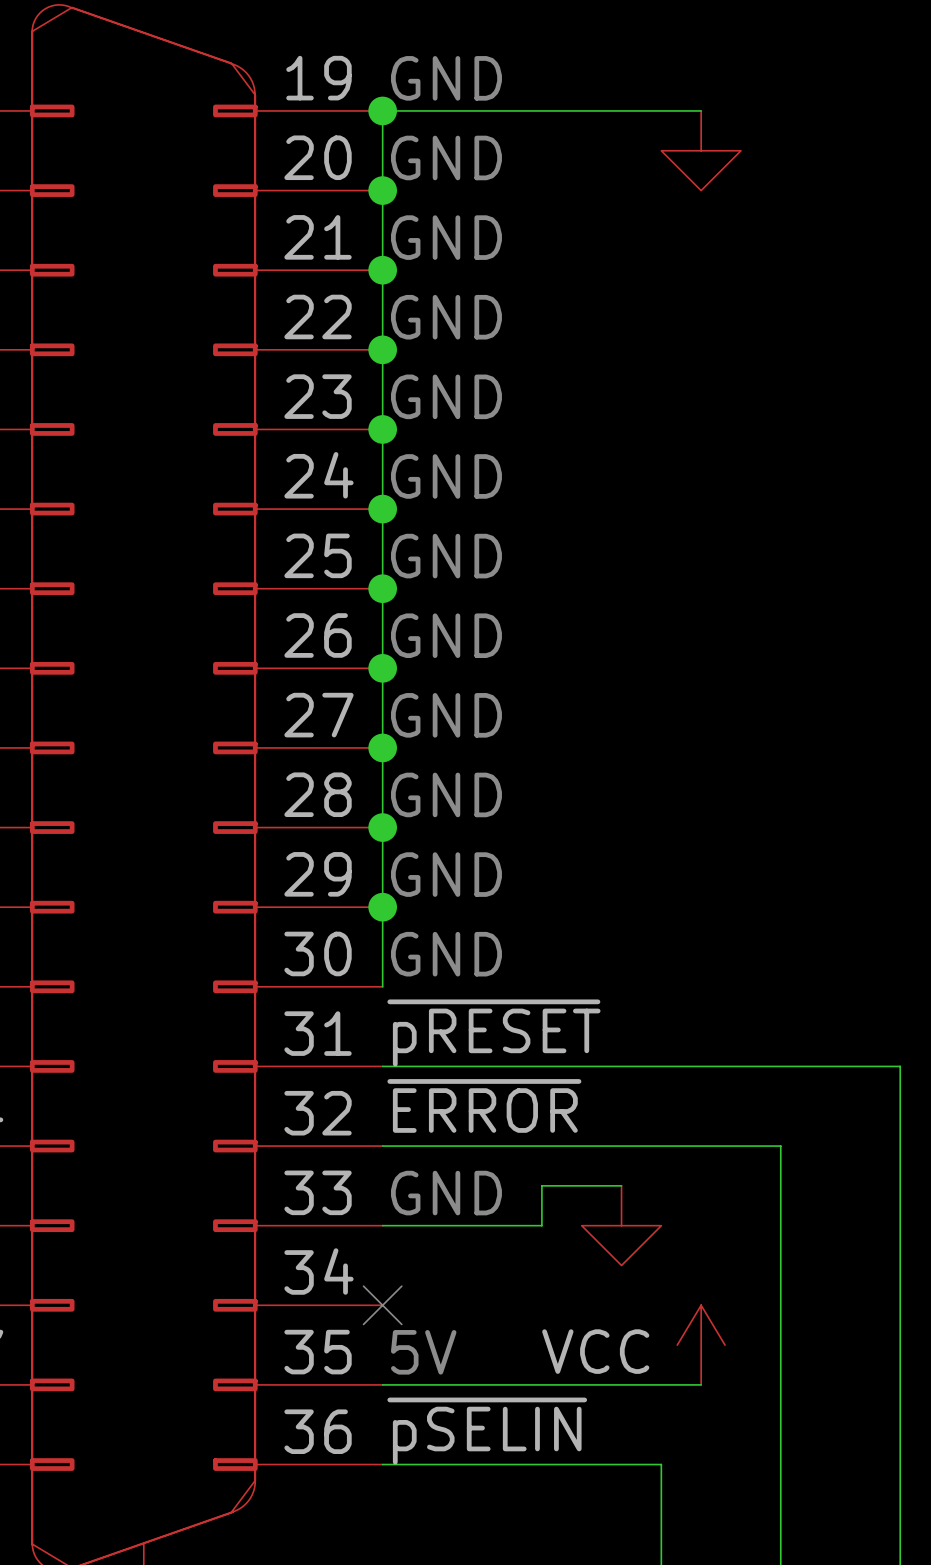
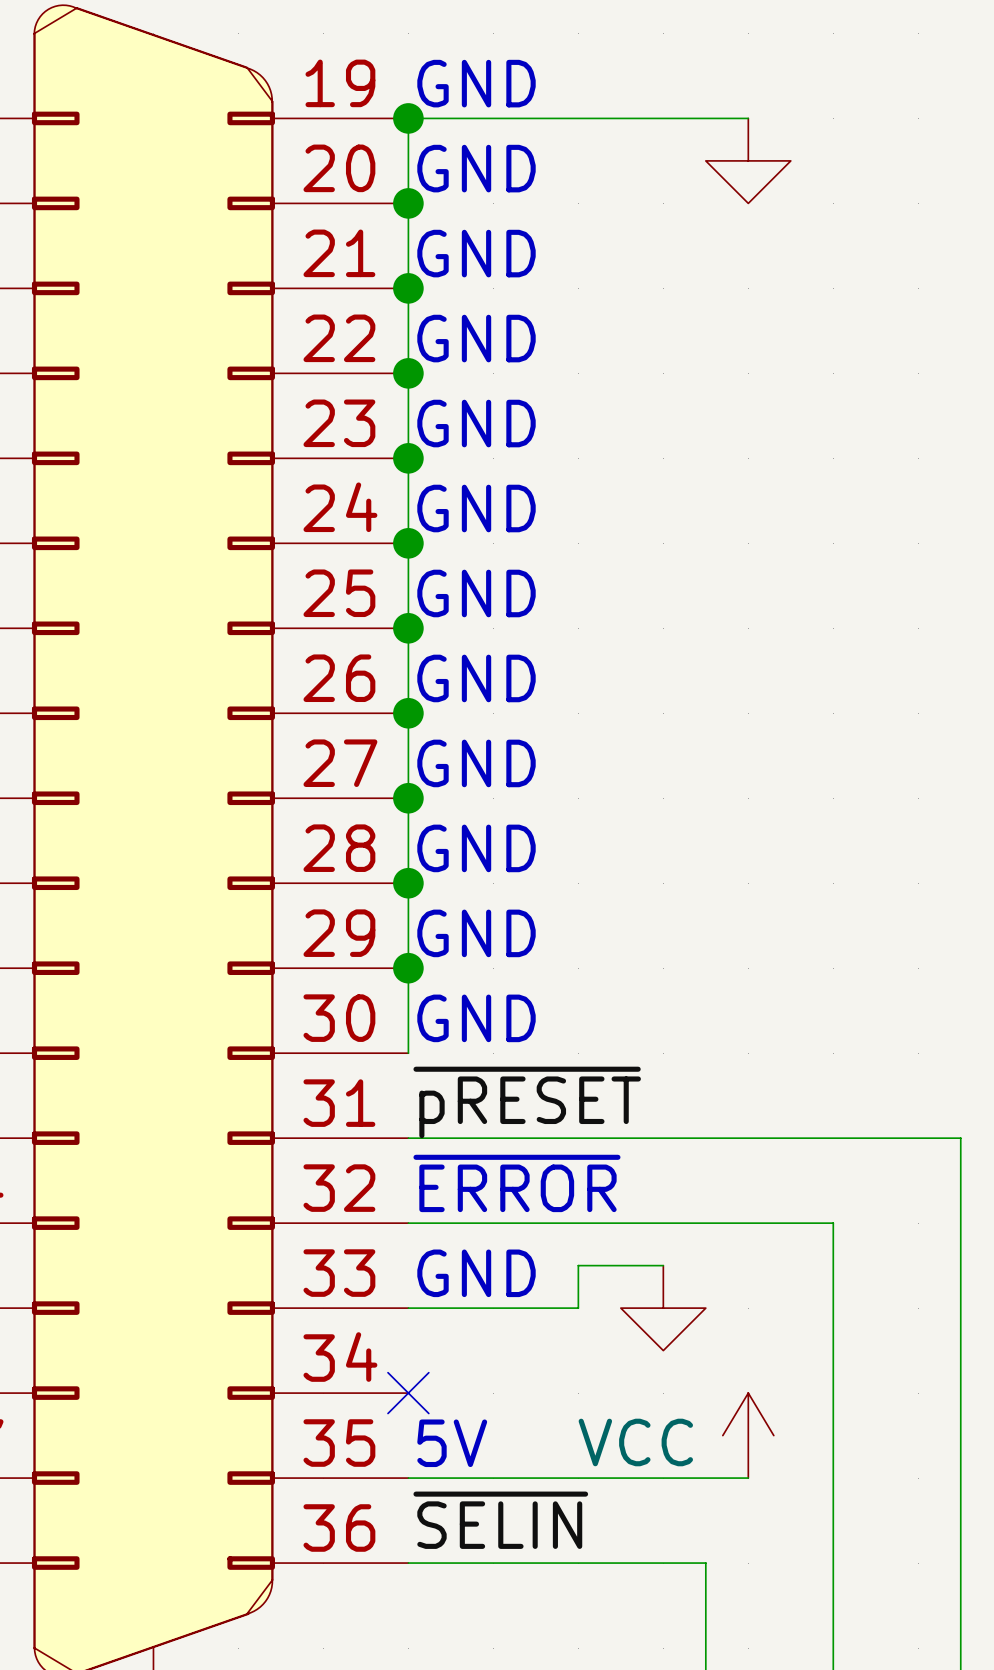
label: ~{ERROR} (484, 1105) -> none
text: none -> ~{ERROR} (516, 1183)
label: ~{pSELIN} (487, 1431) -> ~{SELIN} (500, 1520)

